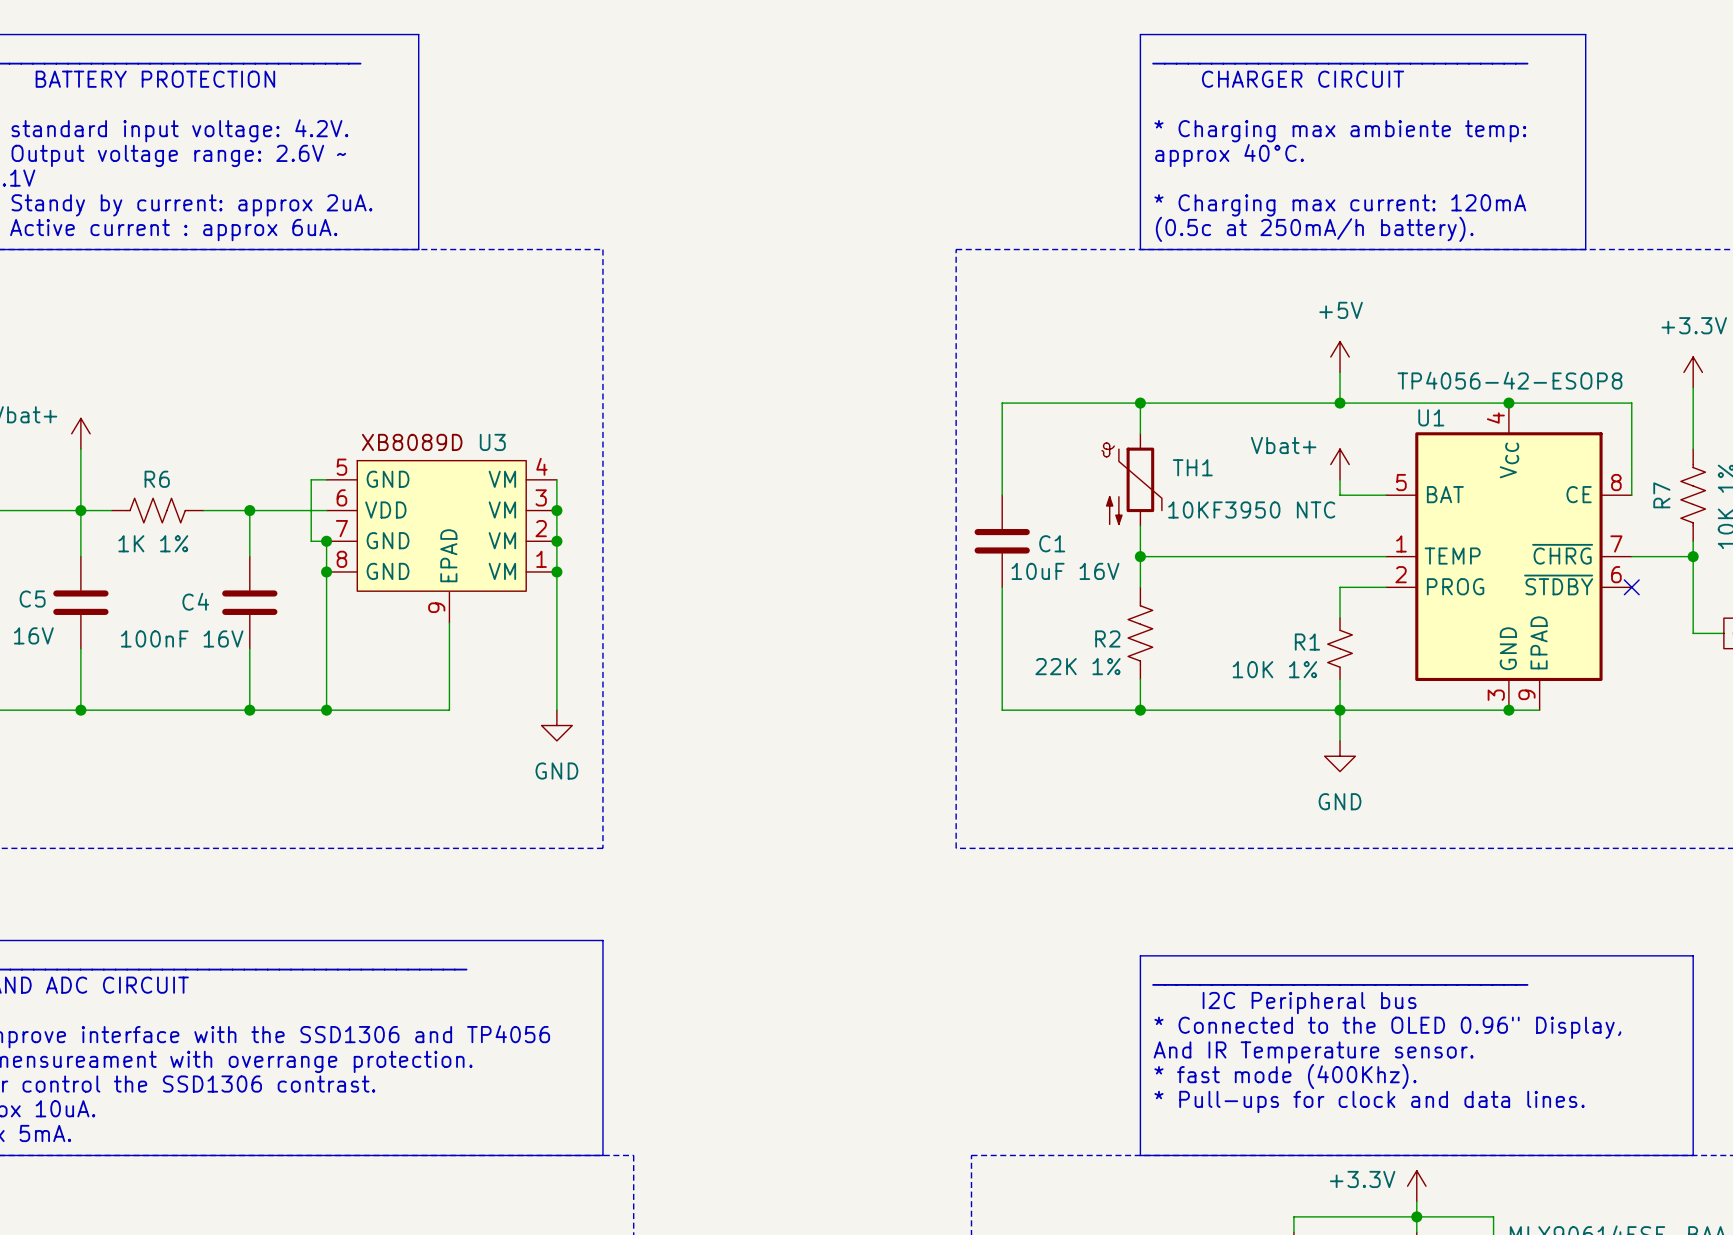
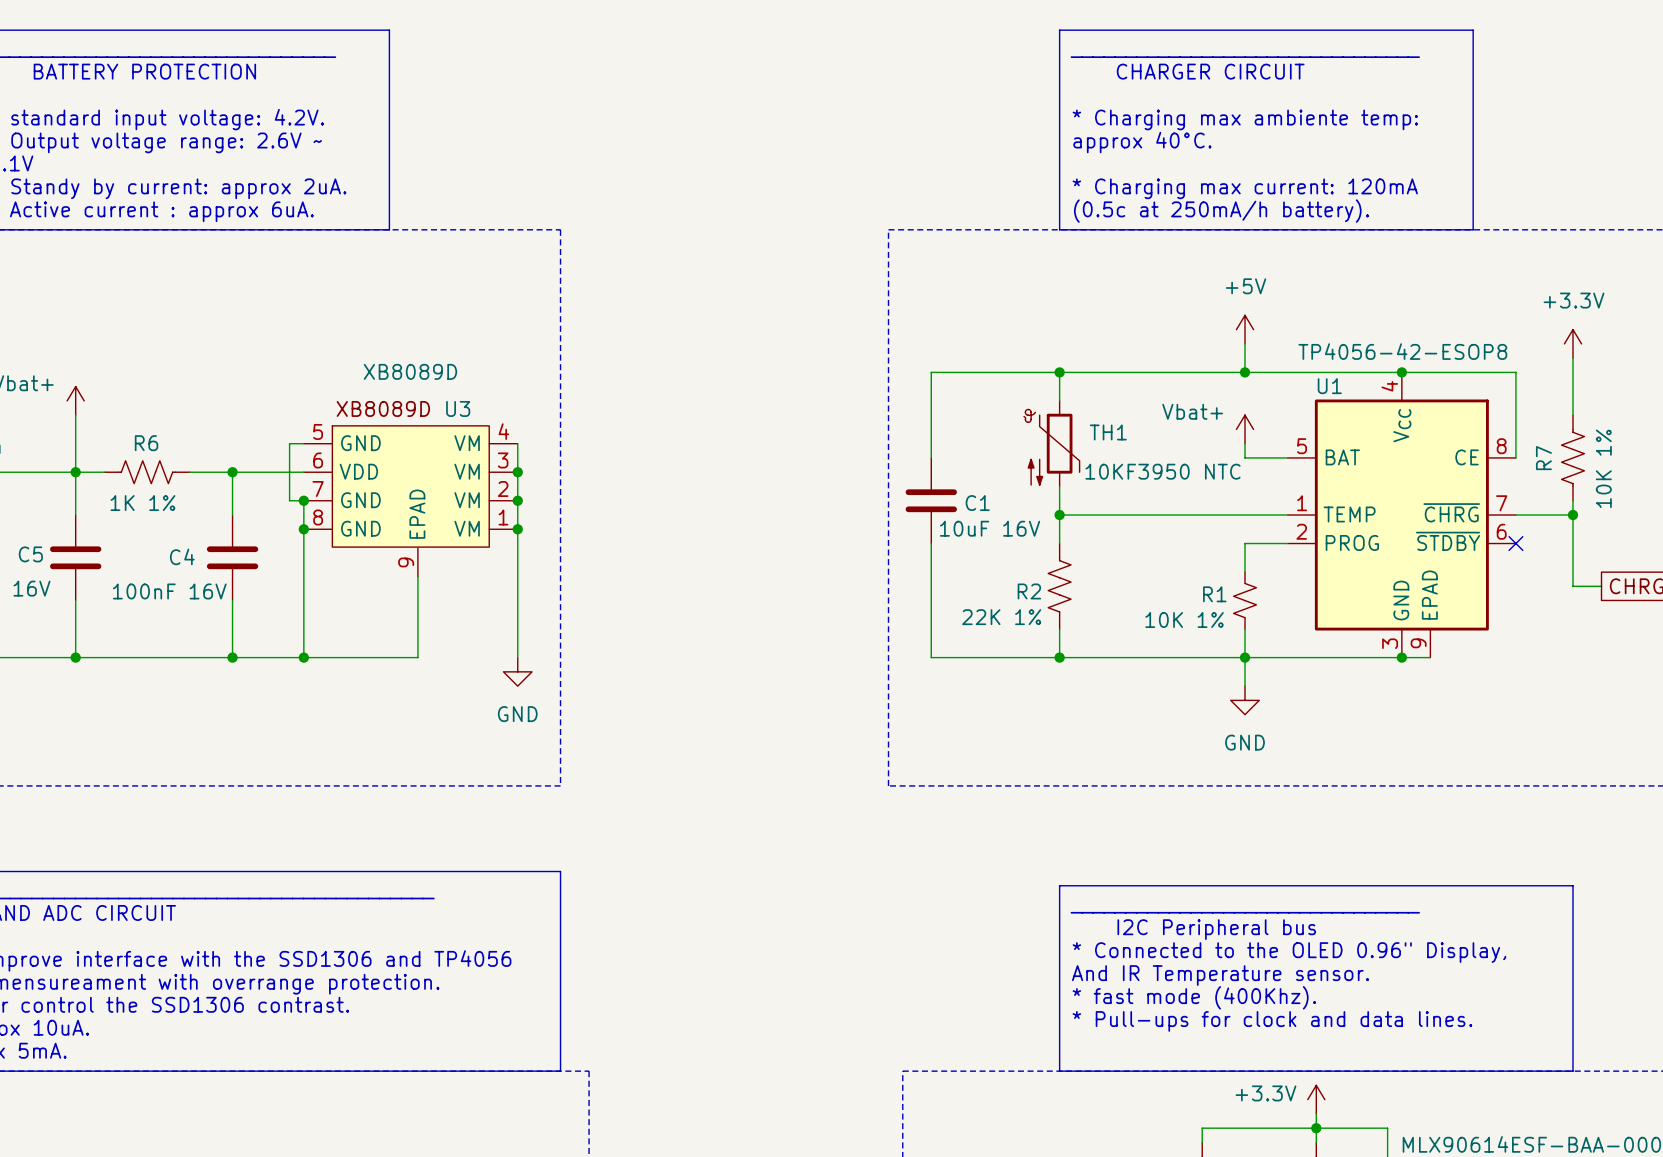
U3 value: none -> XB8089D (410, 371)

